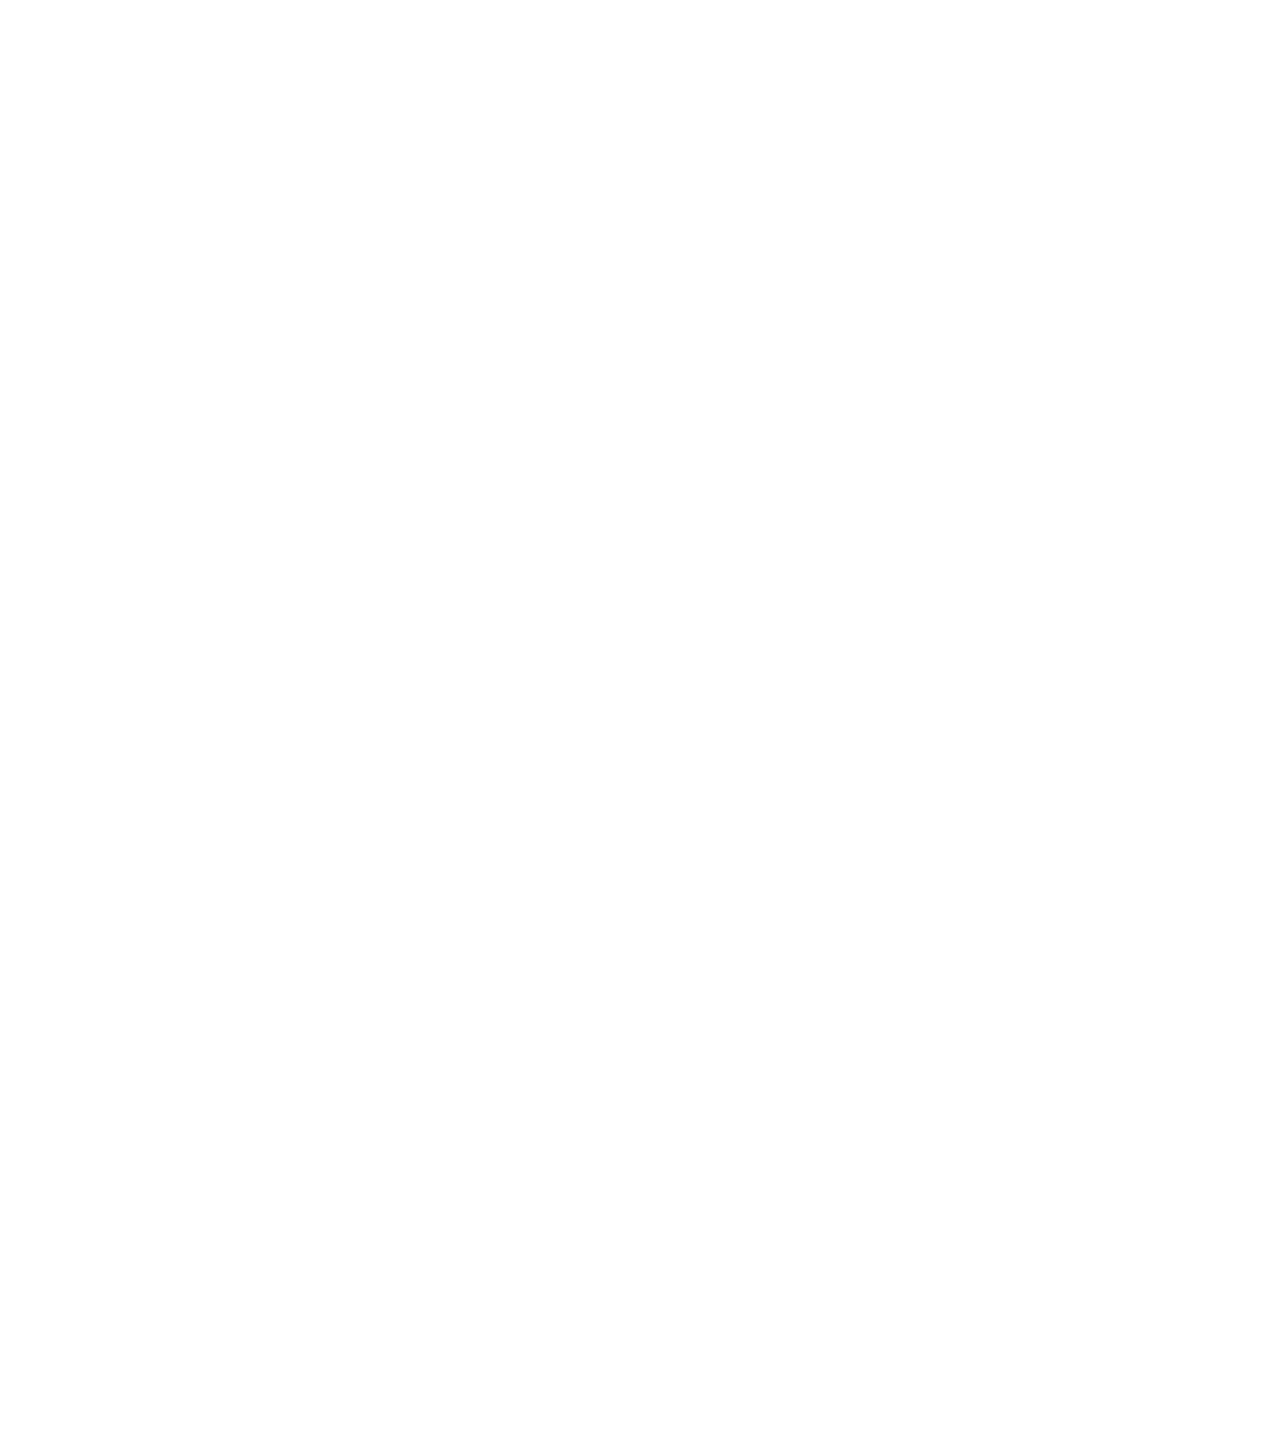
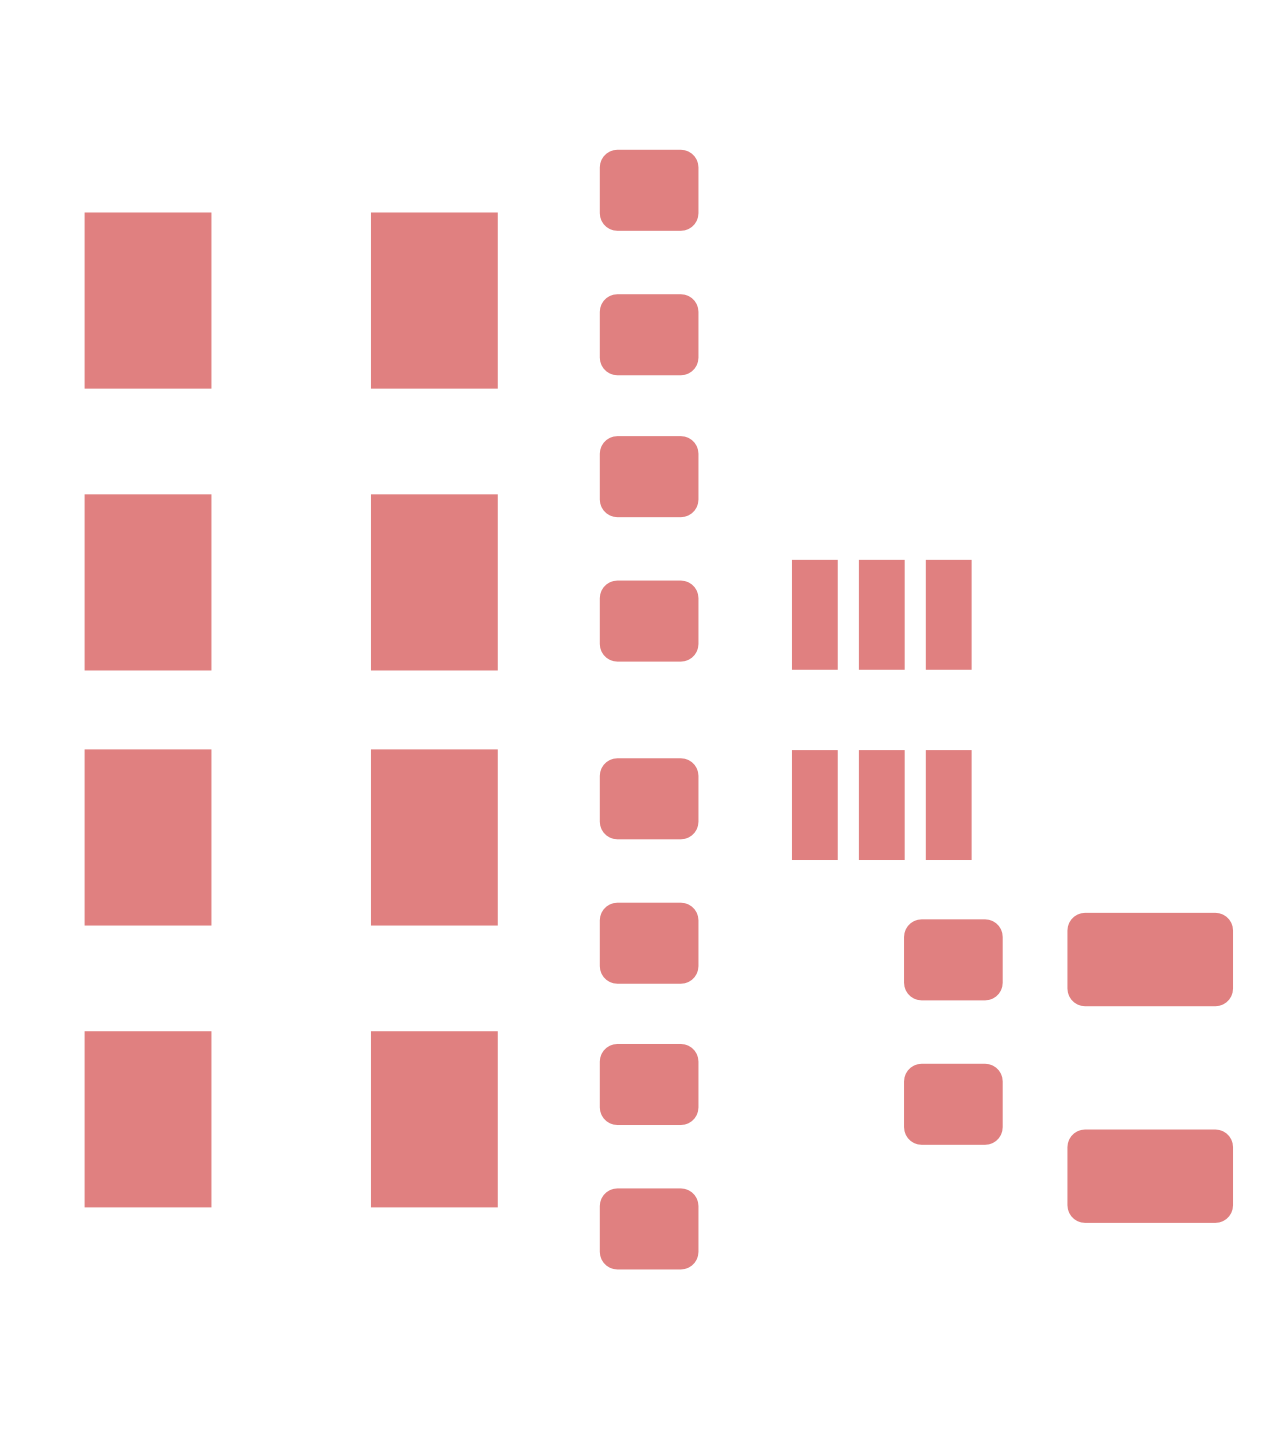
part: none -> (649, 262)
part: none -> (148, 441)
part: none -> (434, 441)
part: none -> (649, 548)
part: none -> (881, 709)
part: none -> (649, 871)
part: none -> (148, 978)
part: none -> (434, 978)
part: none -> (953, 1032)
part: none -> (1150, 1067)
part: none -> (649, 1156)

